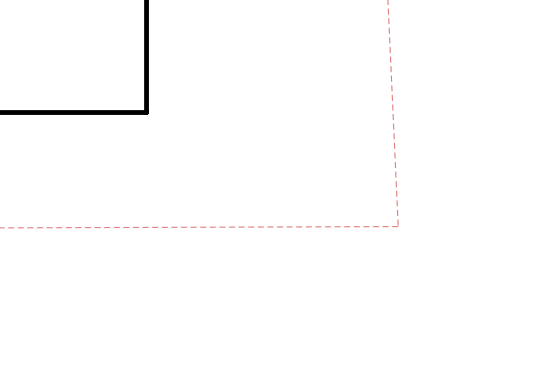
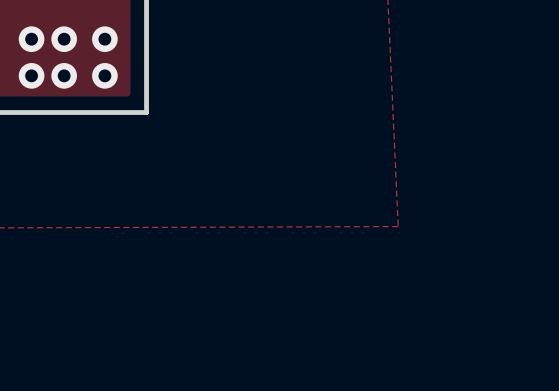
via: none -> (31, 39)
via: none -> (64, 39)
via: none -> (104, 39)
via: none -> (31, 75)
via: none -> (64, 75)
via: none -> (104, 75)

